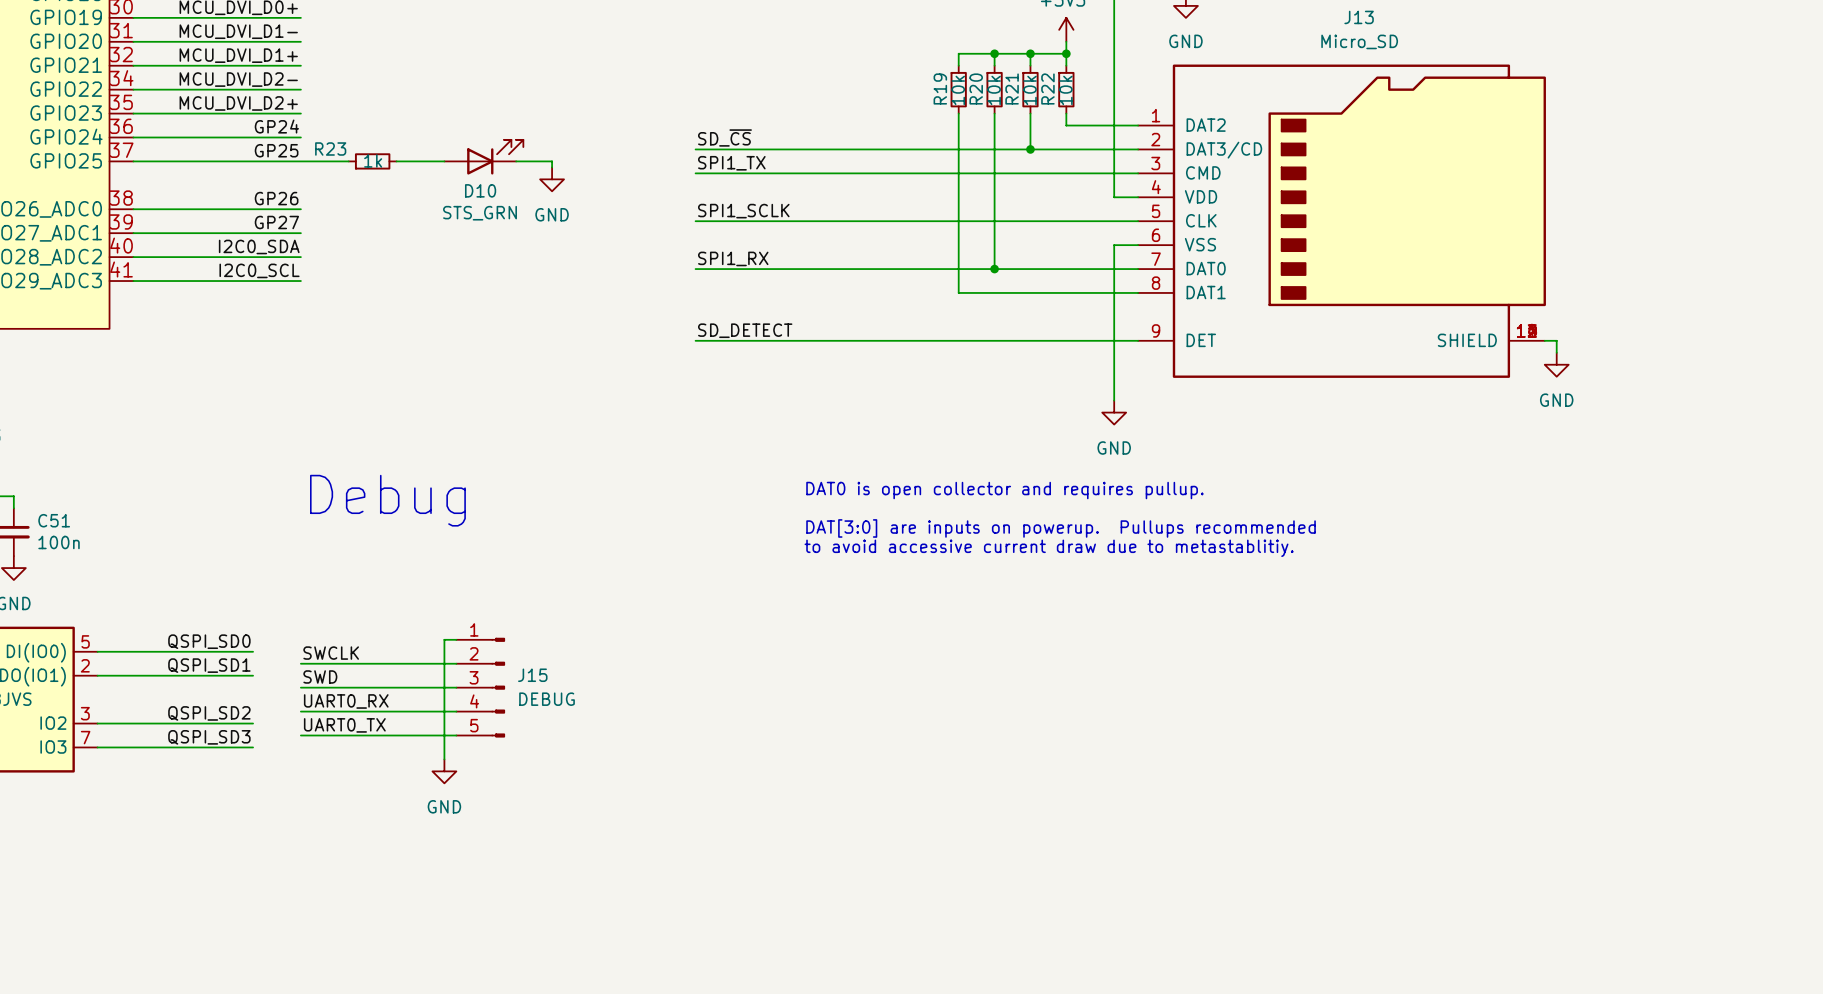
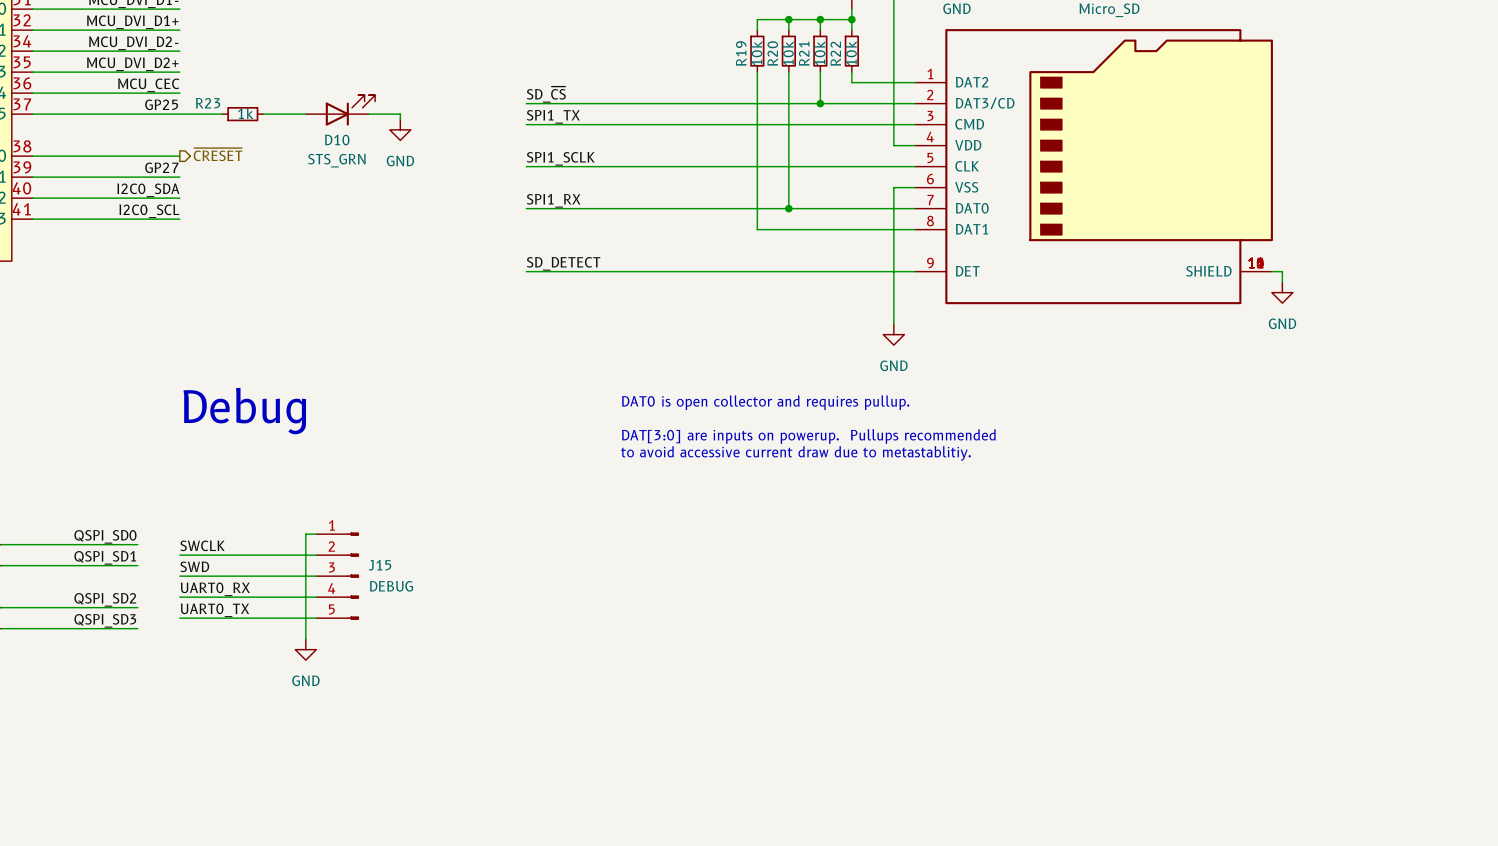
label: GP24 (276, 126) -> MCU_CEC (148, 85)
label: GP26 (276, 198) -> none
hierarchical label: none -> ~{CRESET} (218, 154)

